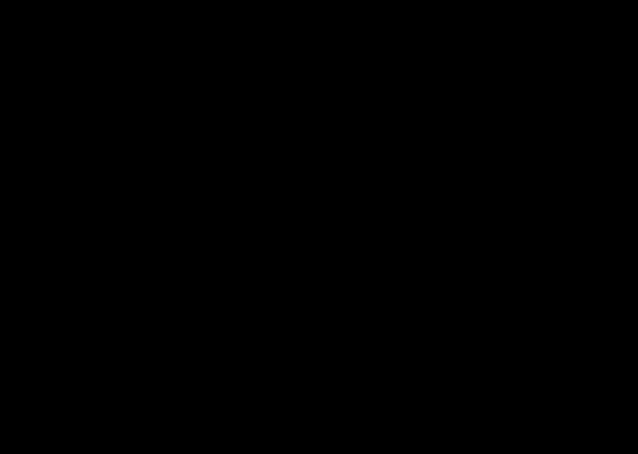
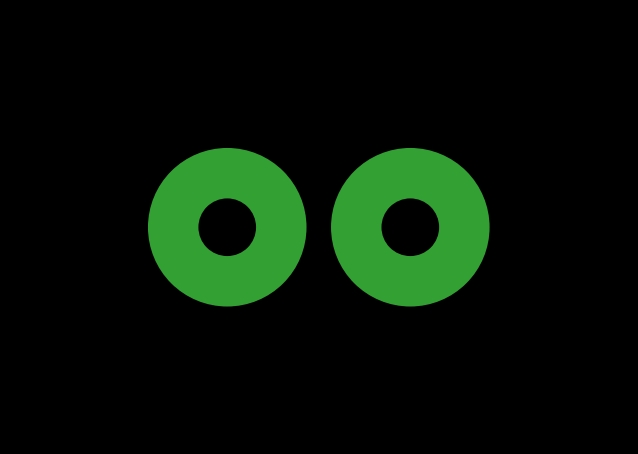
part: none -> (318, 227)

